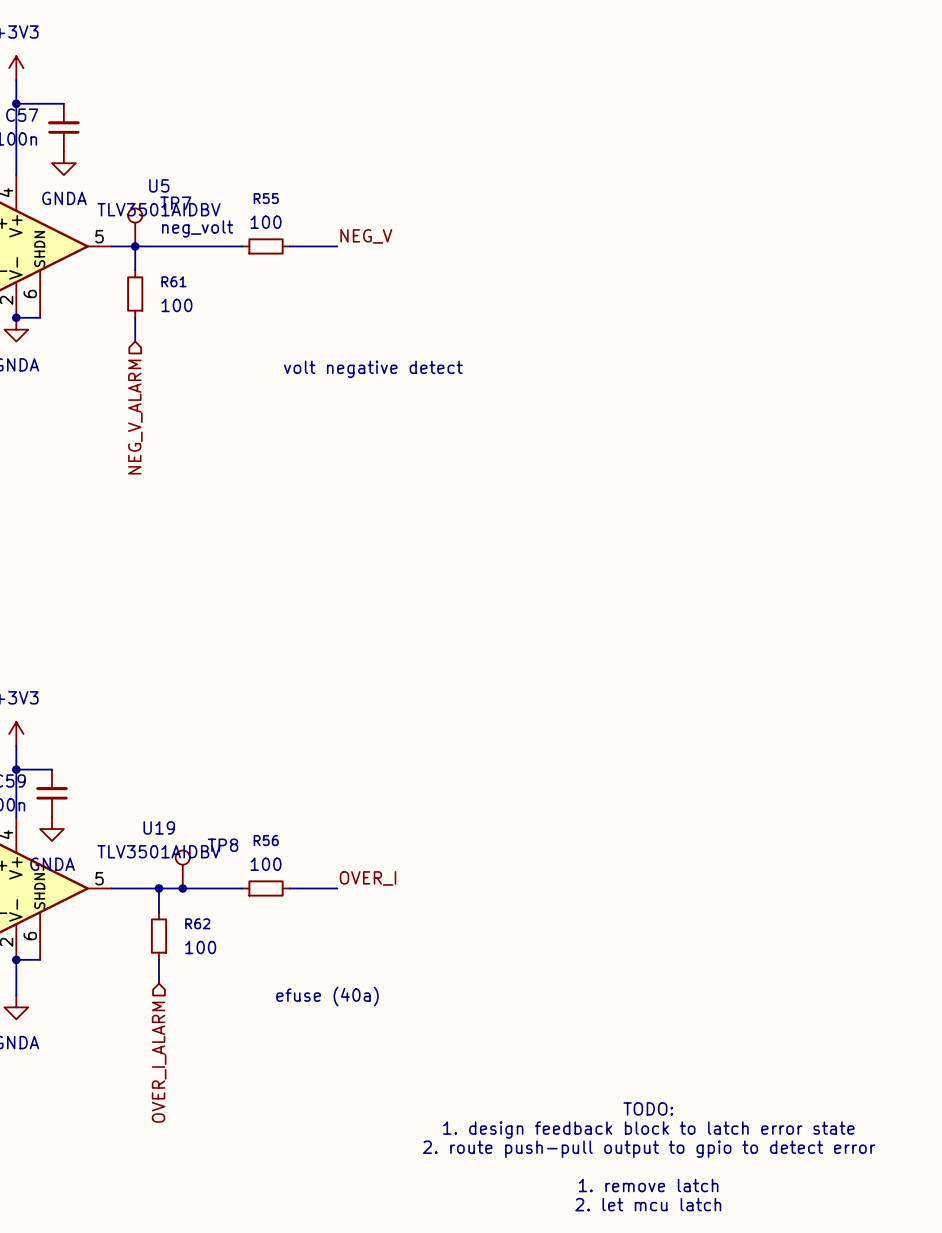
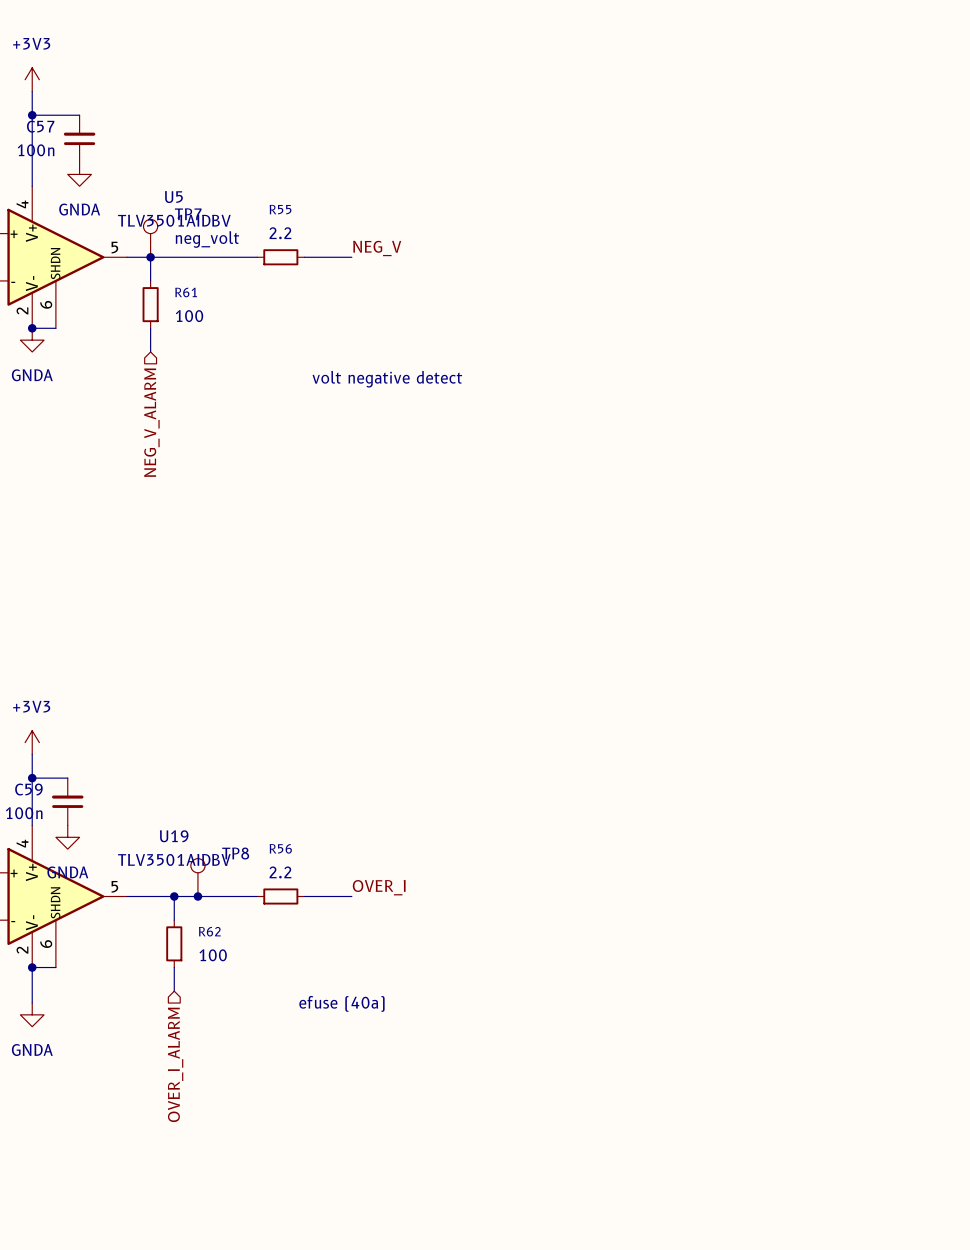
R55 value: 100 (266, 222) -> 2.2 (280, 233)
R56 value: 100 (266, 864) -> 2.2 (280, 872)
text: TODO: (648, 1108) -> none
text: 1. design feedback block to latch error state (648, 1130) -> none
text: 2. route push-pull output to gpio to detect error (649, 1149) -> none
text: 1. remove latch (648, 1185) -> none
text: 2. let mcu latch (648, 1204) -> none

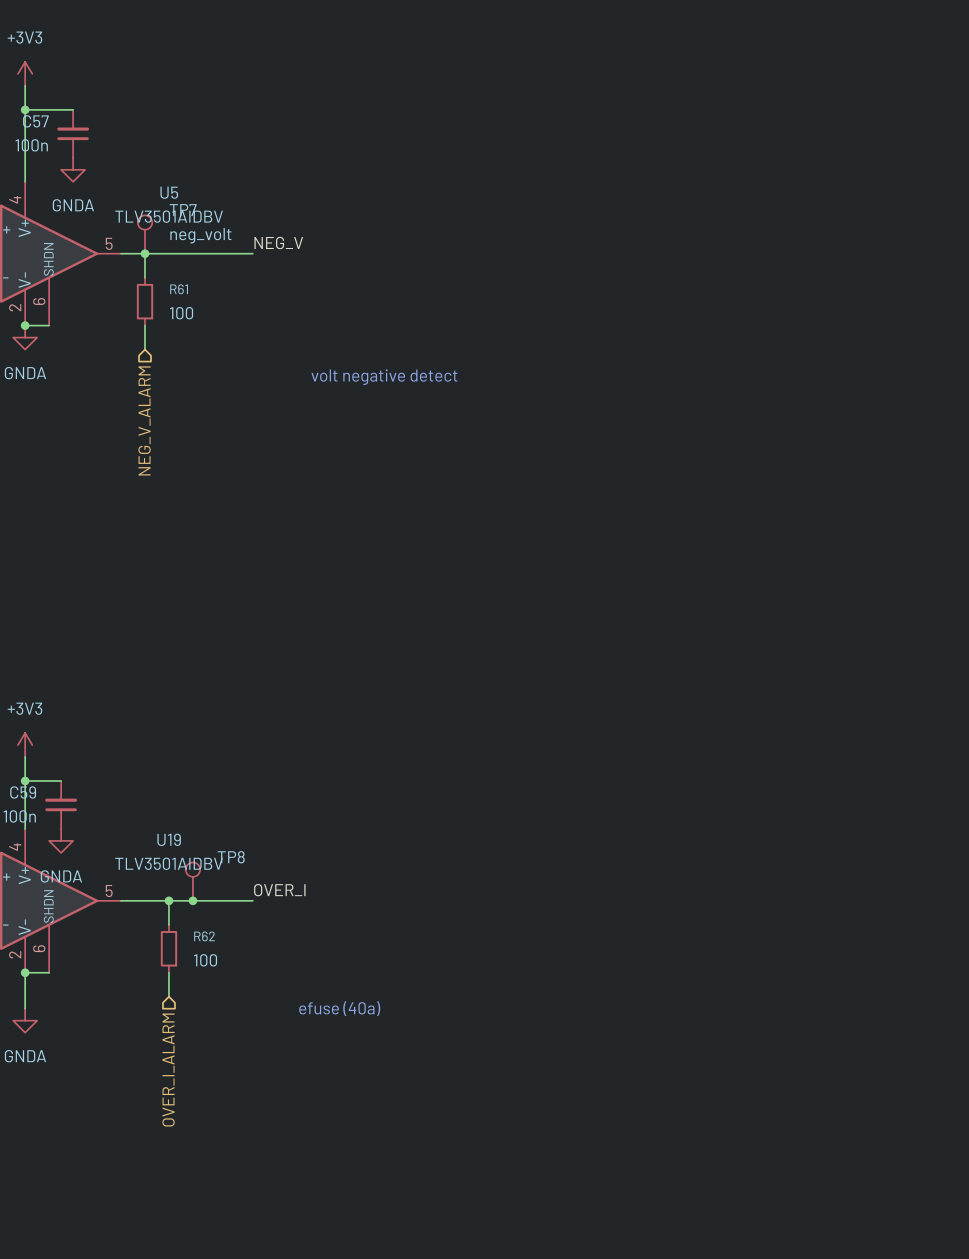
label position: NEG_V (377, 248) -> NEG_V (278, 243)
R55: 2.2 (280, 257) -> none
wire: (304, 257) (351, 257) -> none
label position: OVER_I (379, 887) -> OVER_I (279, 890)
R56: 2.2 (280, 896) -> none
wire: (304, 896) (351, 896) -> none

